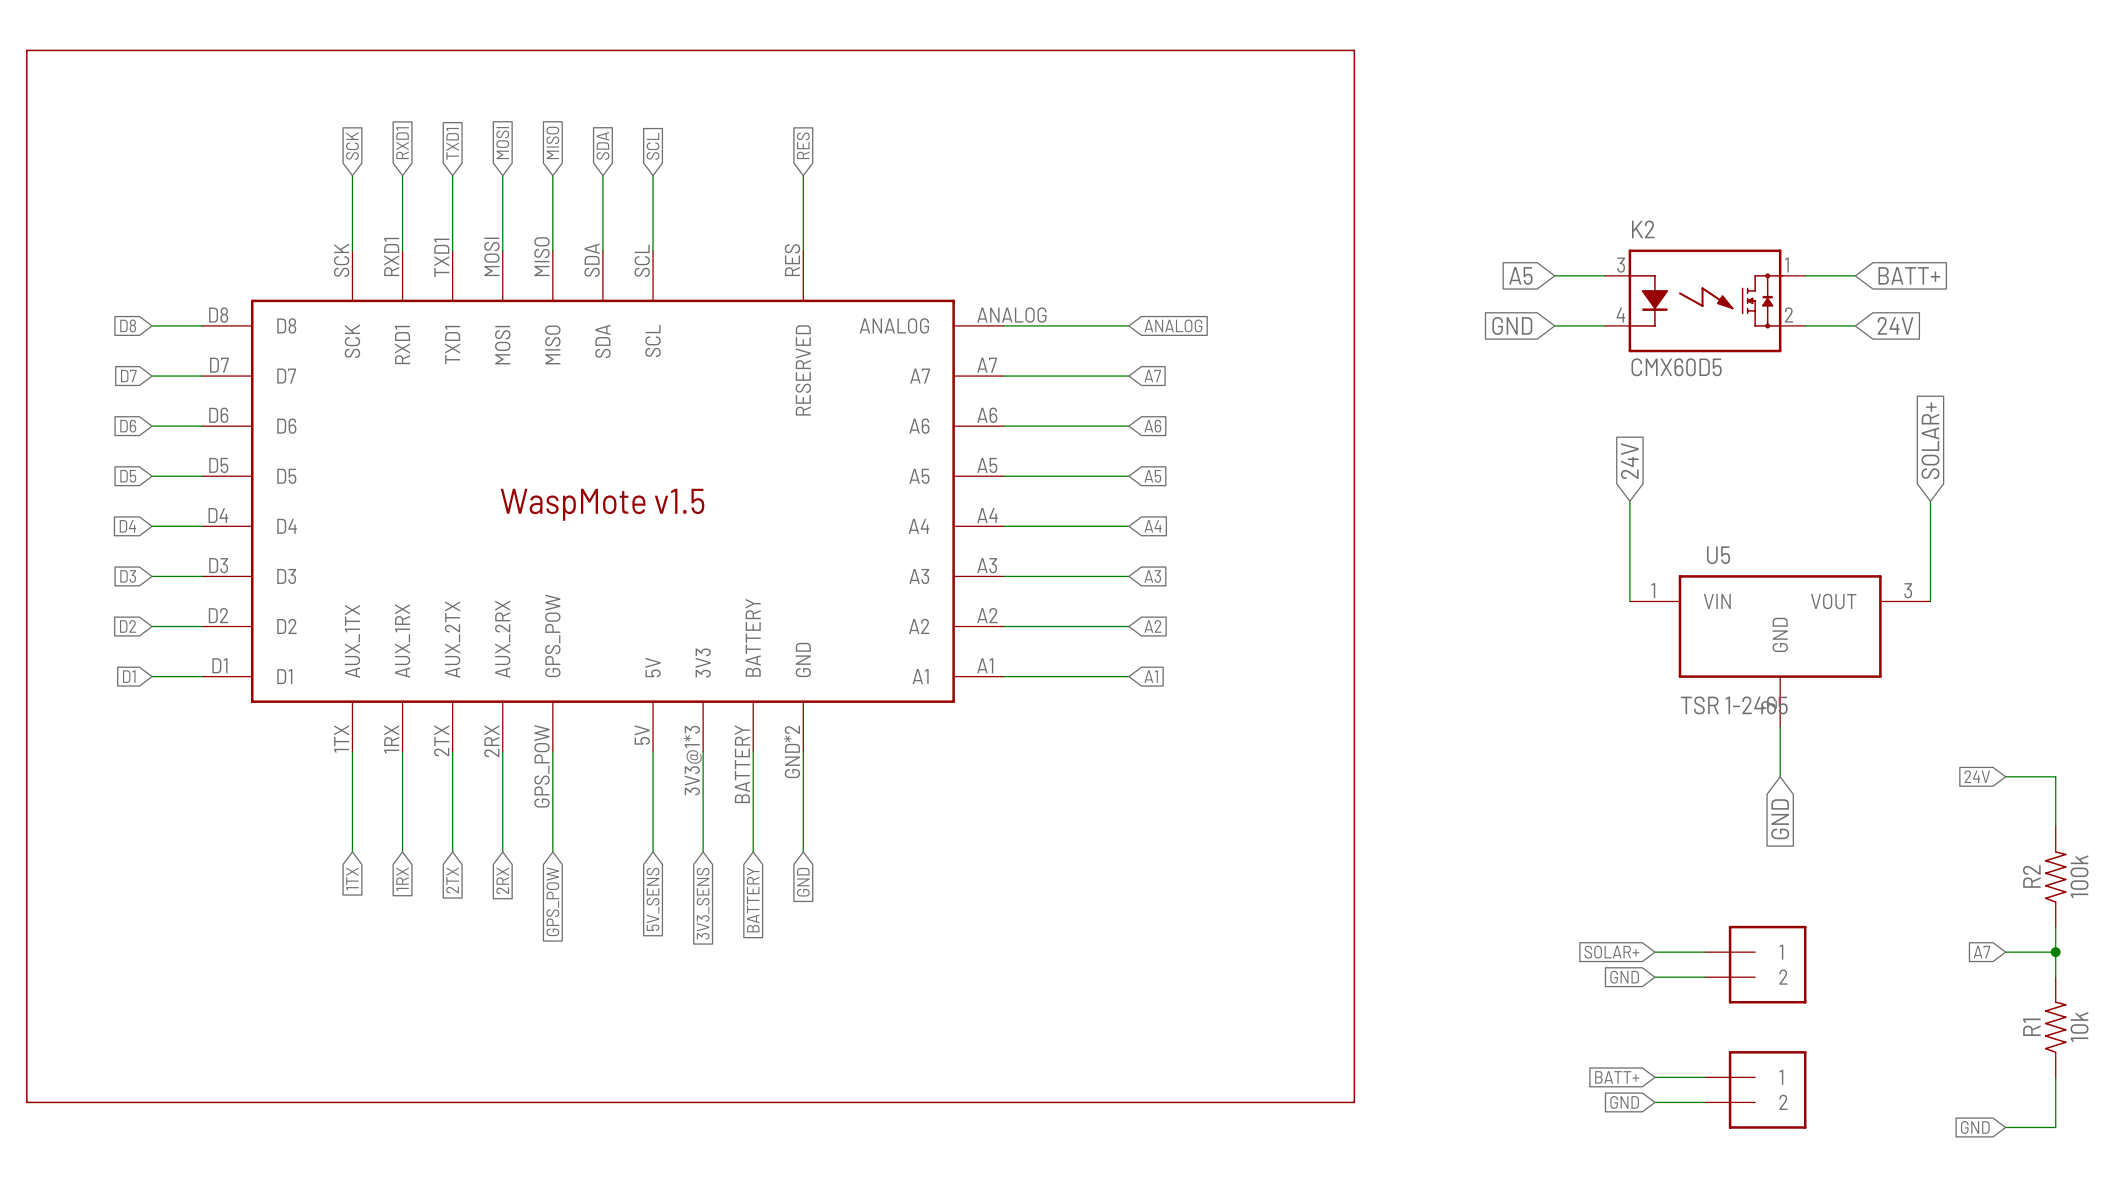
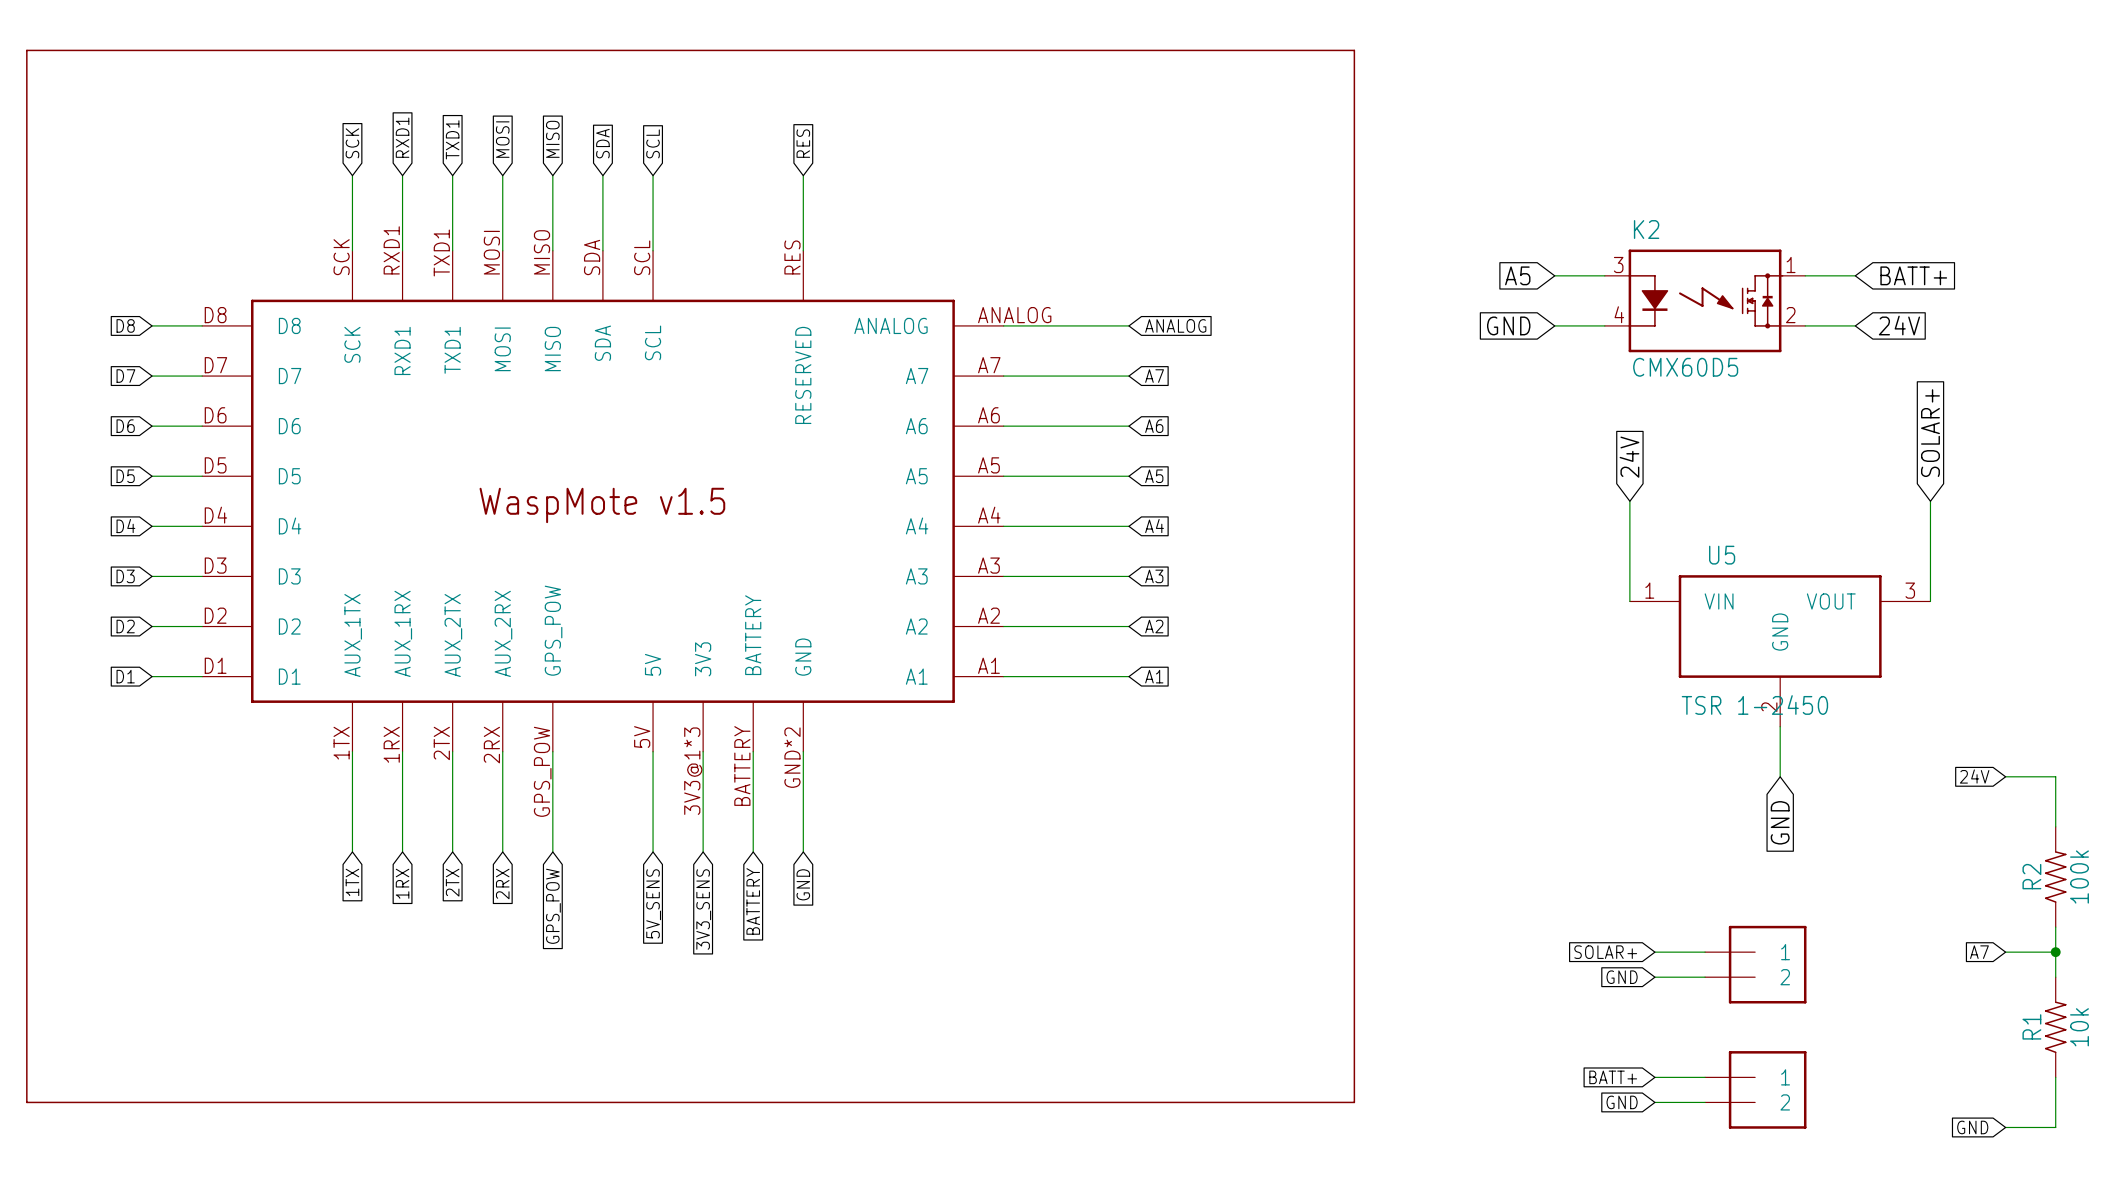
U5 value: TSR 1-2465 (1734, 705) -> TSR 1-2450 (1754, 705)

